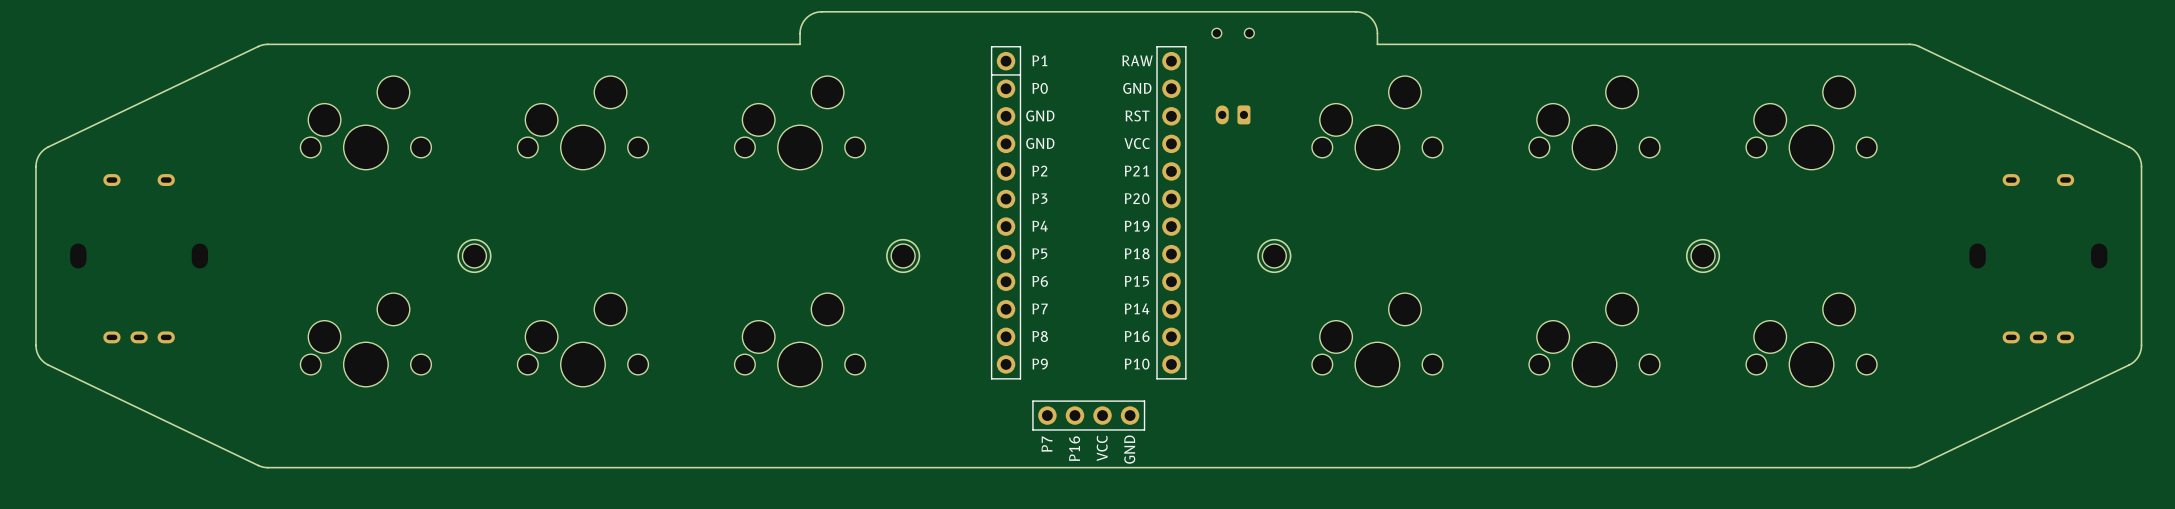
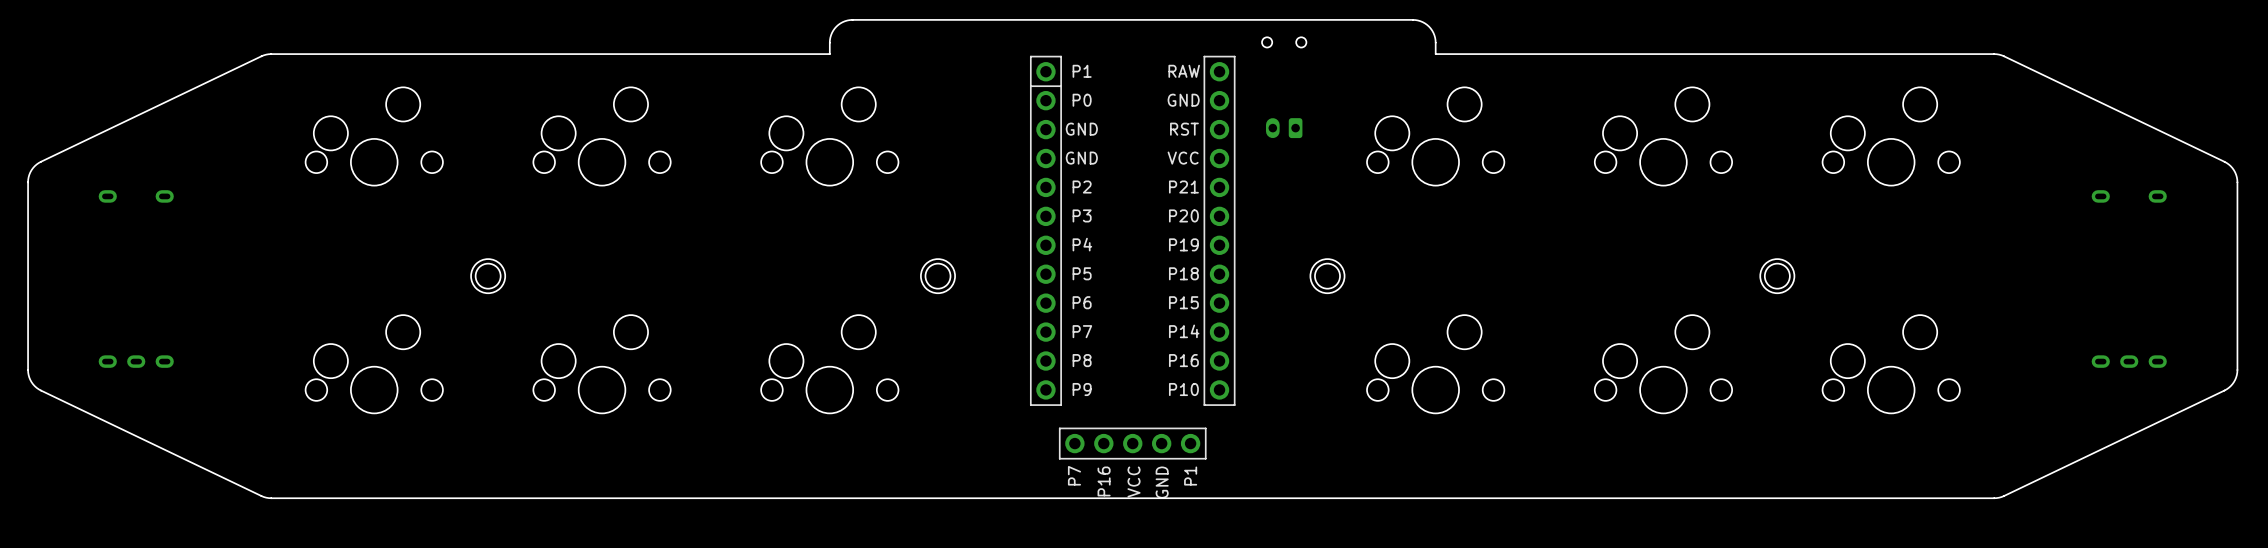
part footprint: [1032, 400, 1146, 431] -> [1059, 427, 1207, 460]

